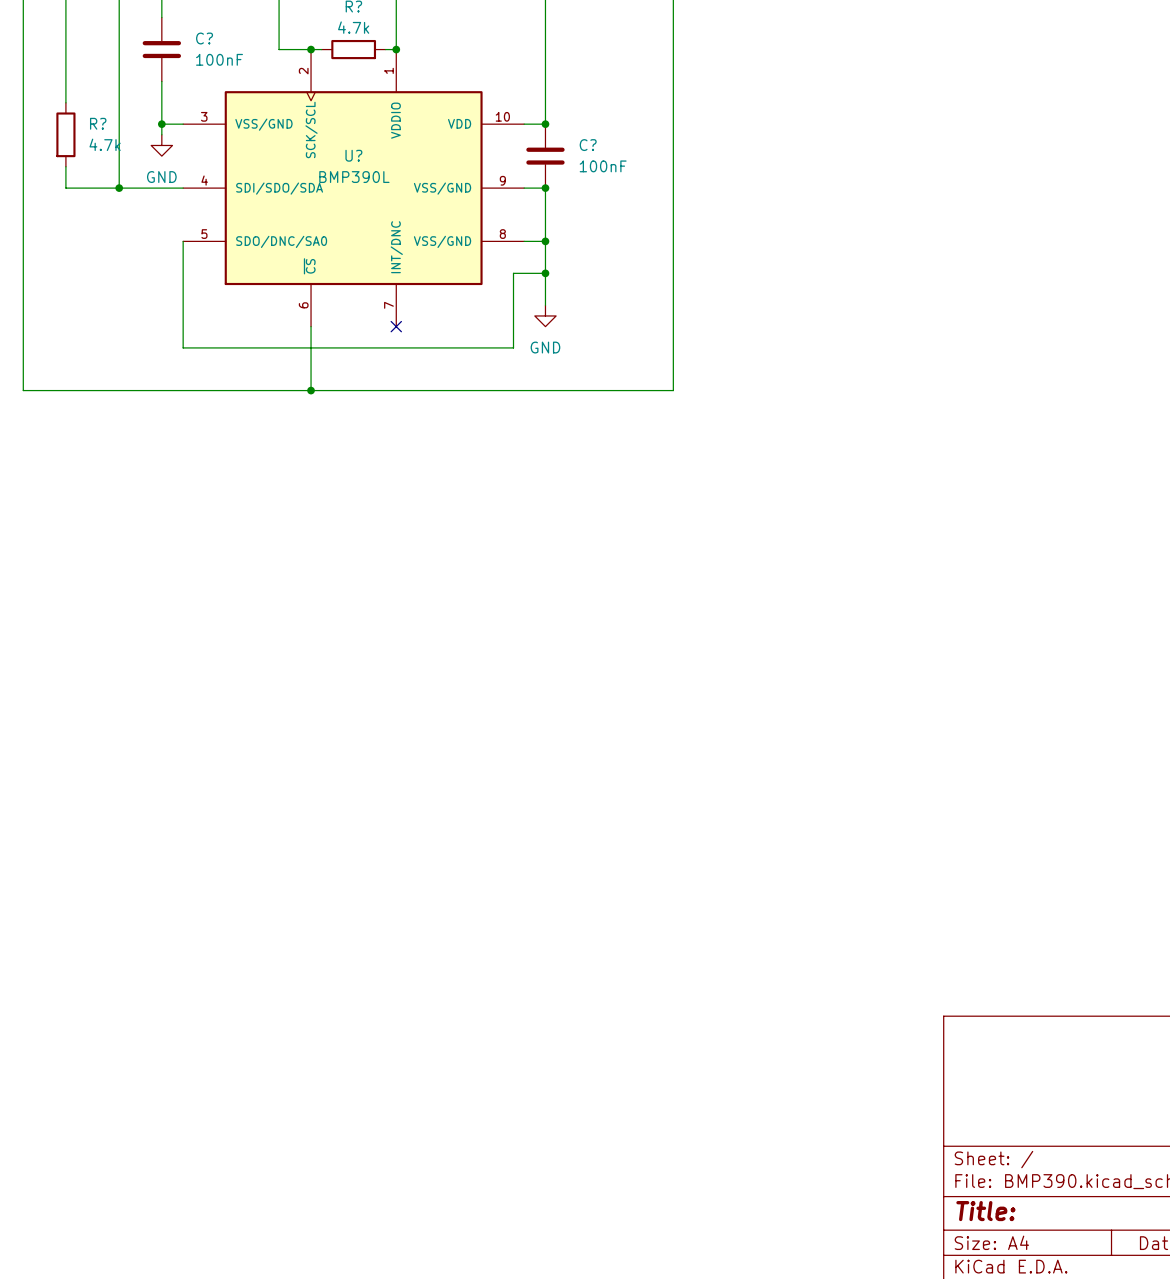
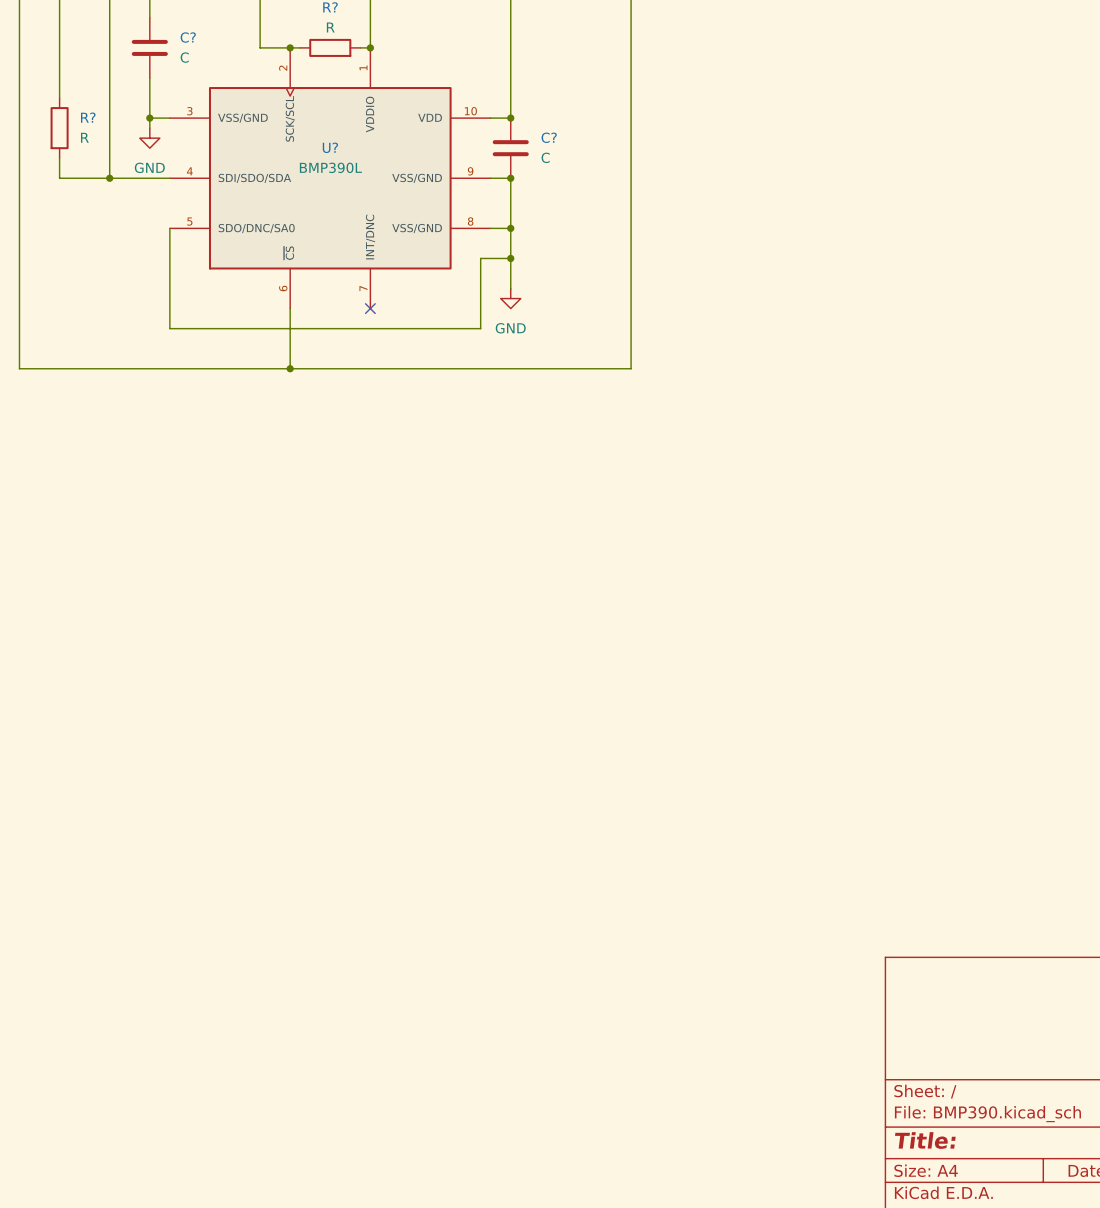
R? value: 4.7k (353, 27) -> R (330, 27)
C? value: 100nF (219, 59) -> C (184, 57)
R? value: 4.7k (105, 144) -> R (84, 137)
C? value: 100nF (603, 166) -> C (545, 157)

